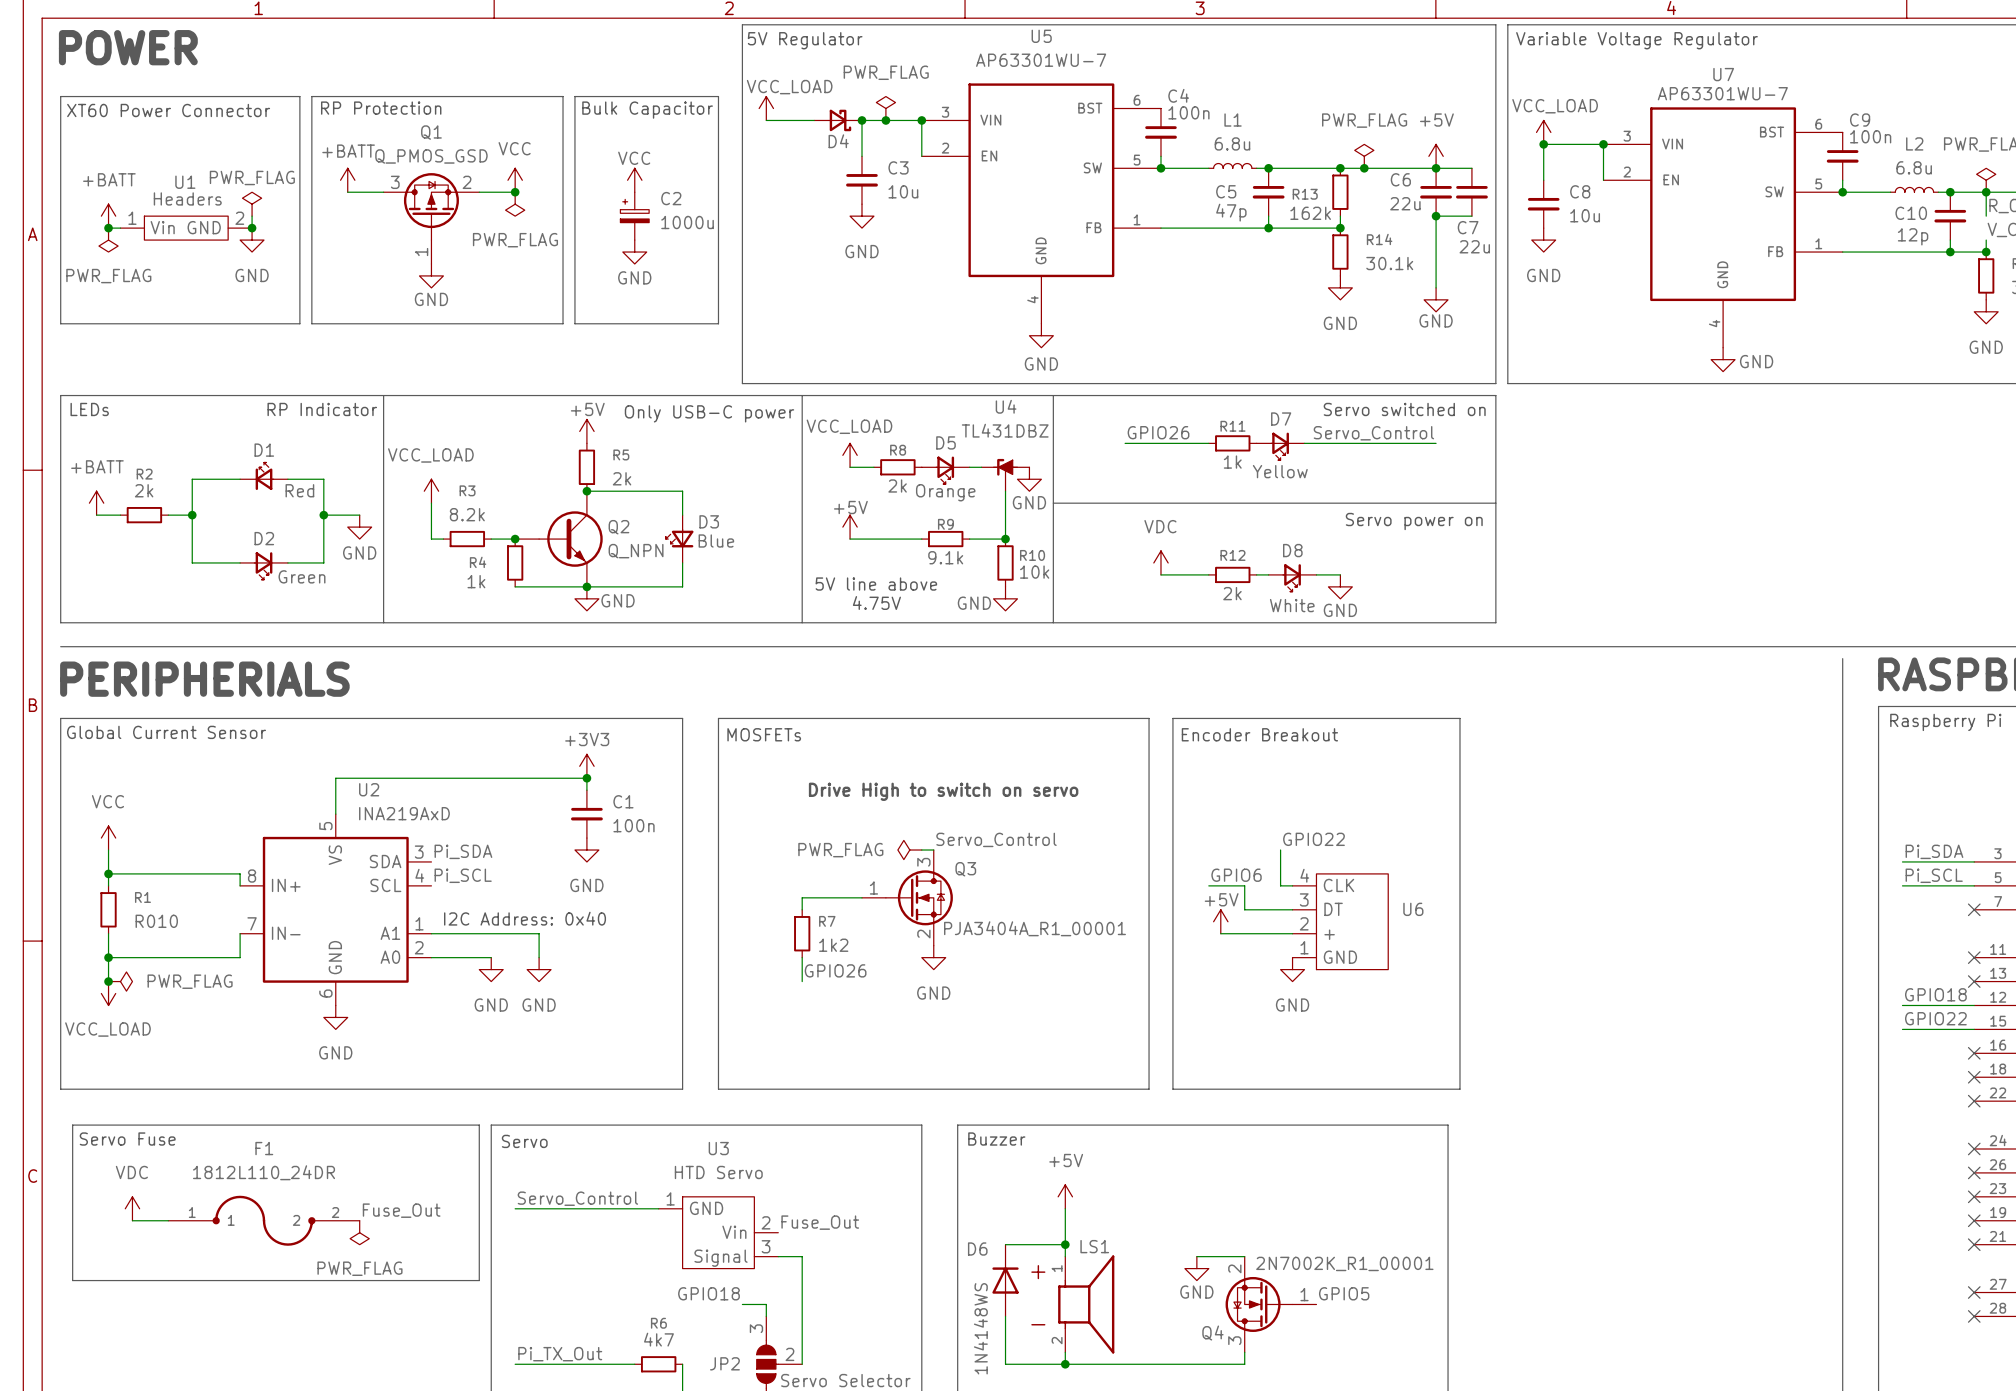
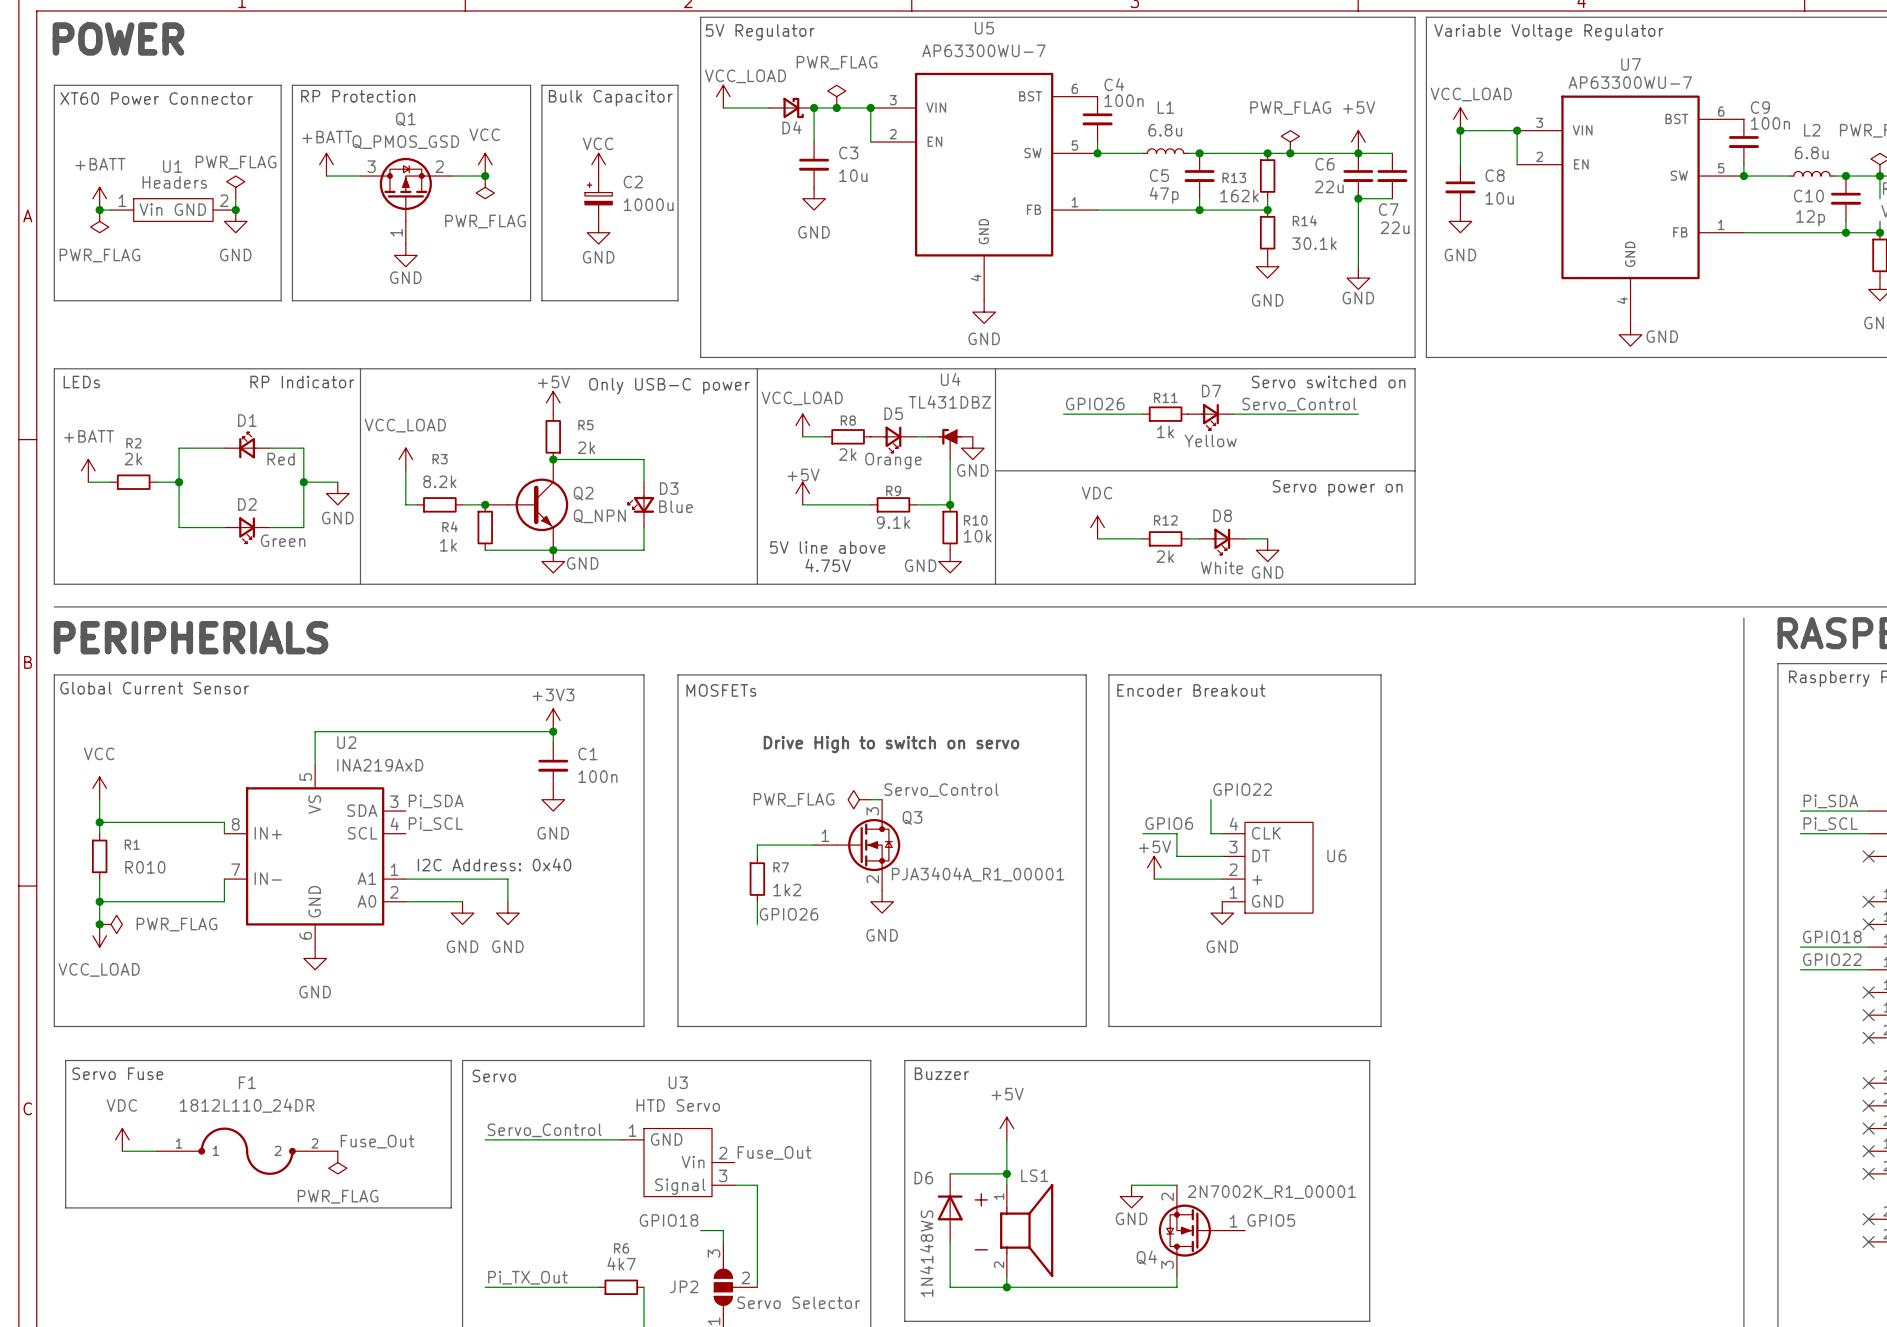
U5 value: AP63301WU-7 (1041, 60) -> AP63300WU-7 (983, 50)
U7 value: AP63301WU-7 (1722, 93) -> AP63300WU-7 (1630, 82)

